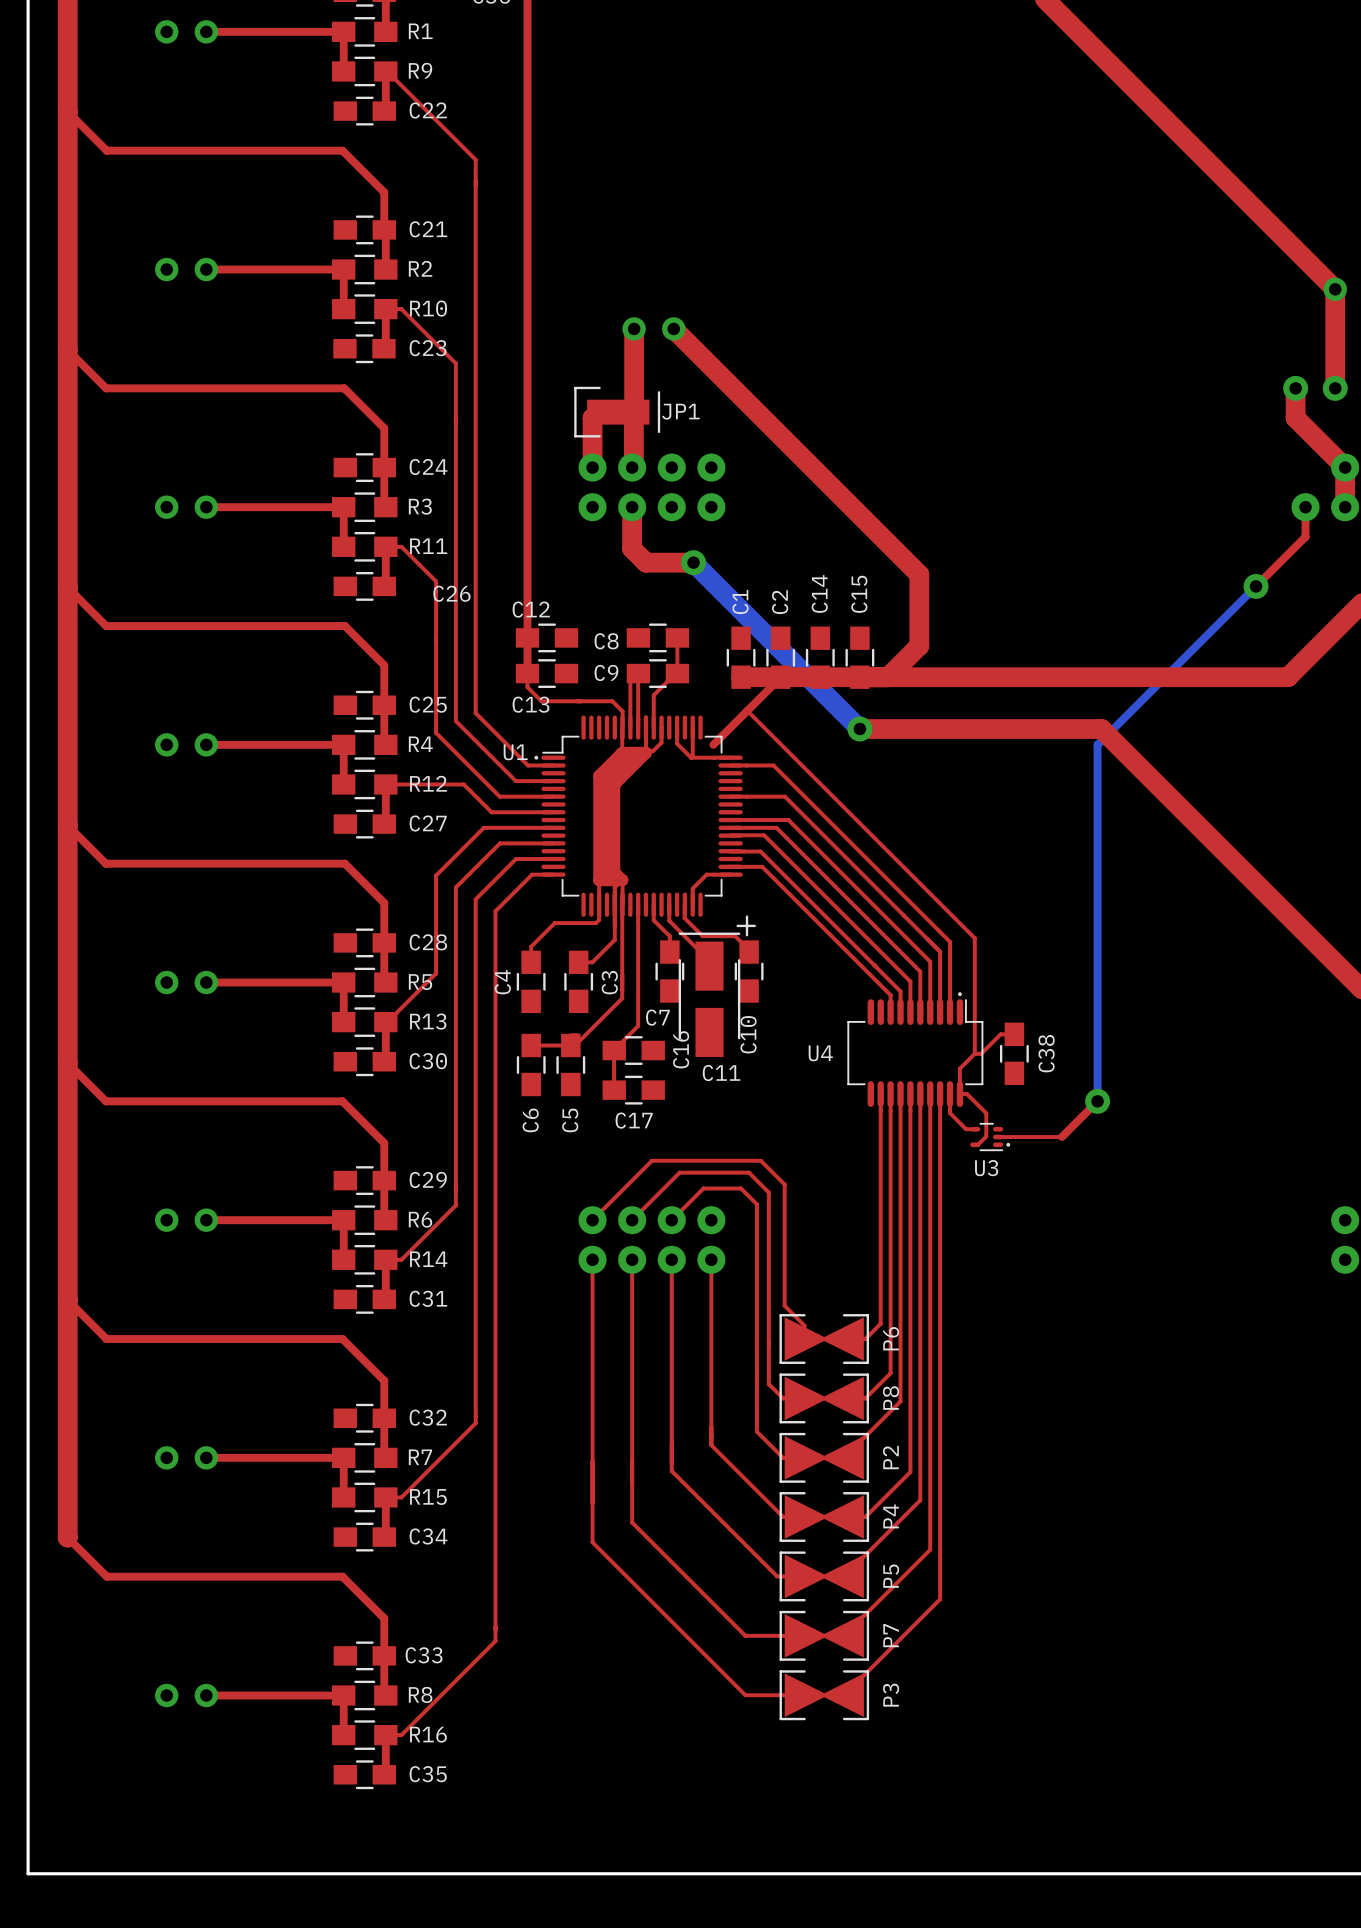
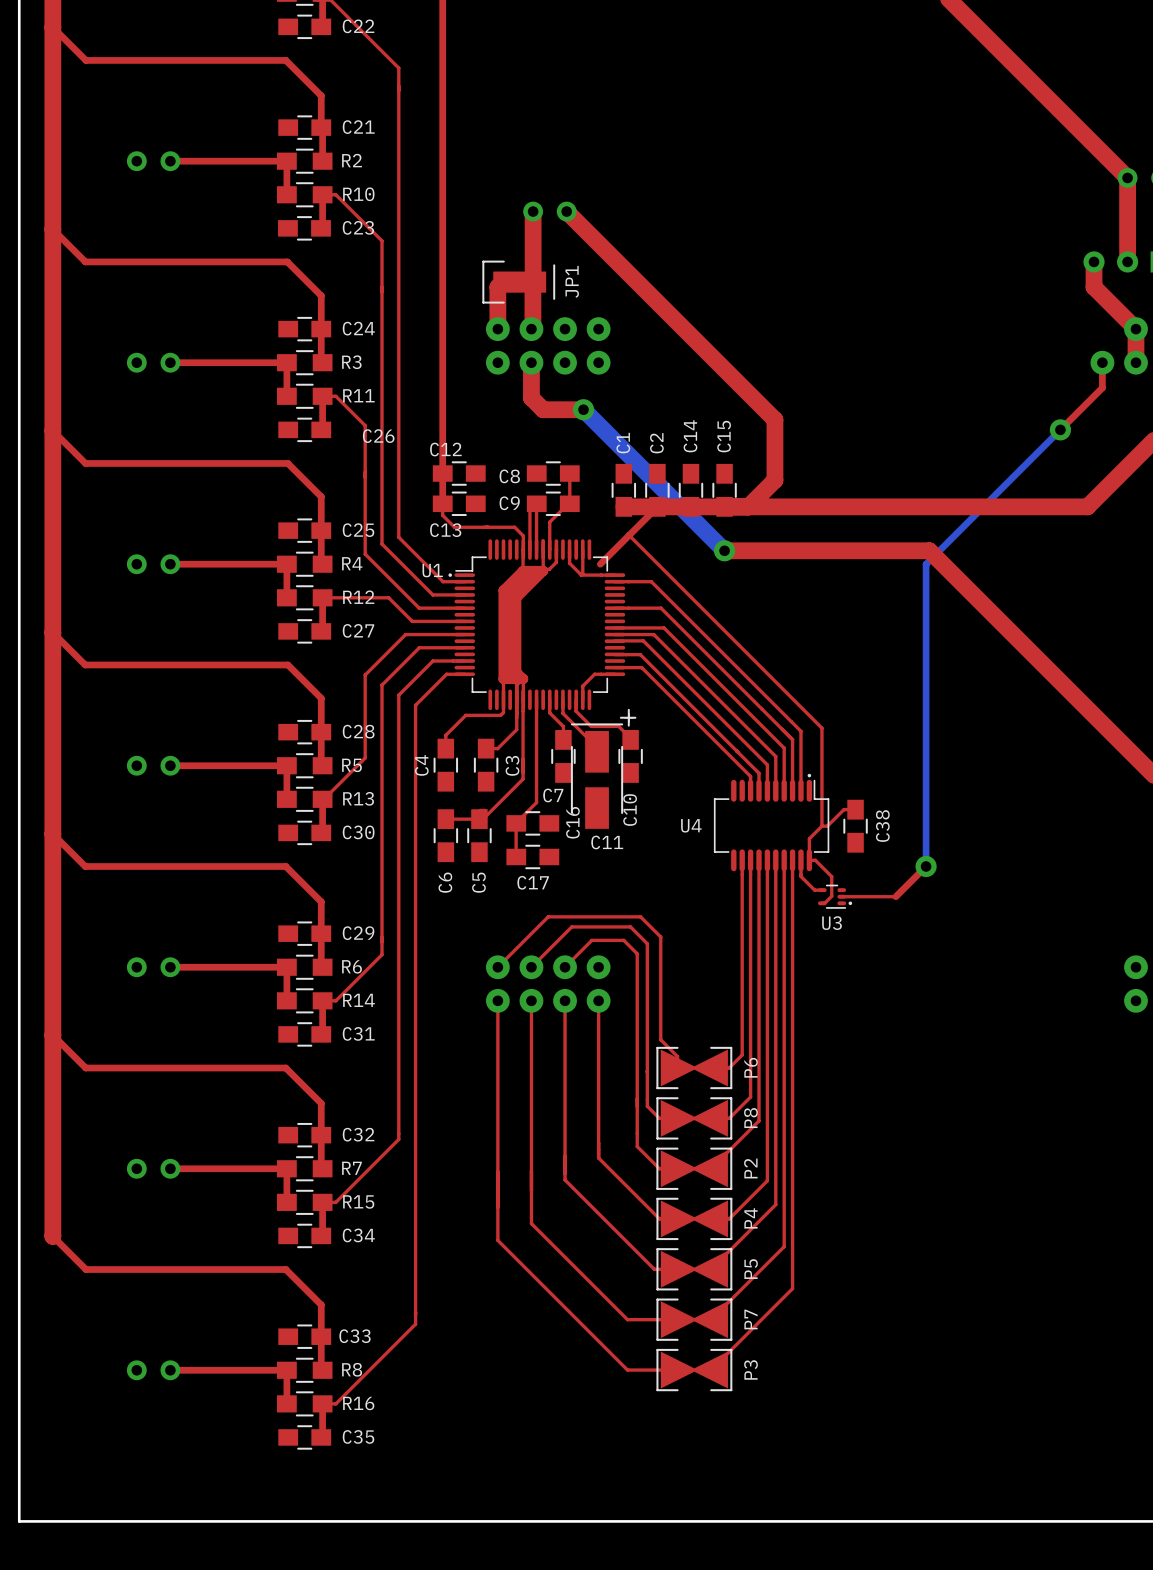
JP1 name rotation: 0° (680, 411) -> 90° counterclockwise (572, 281)

